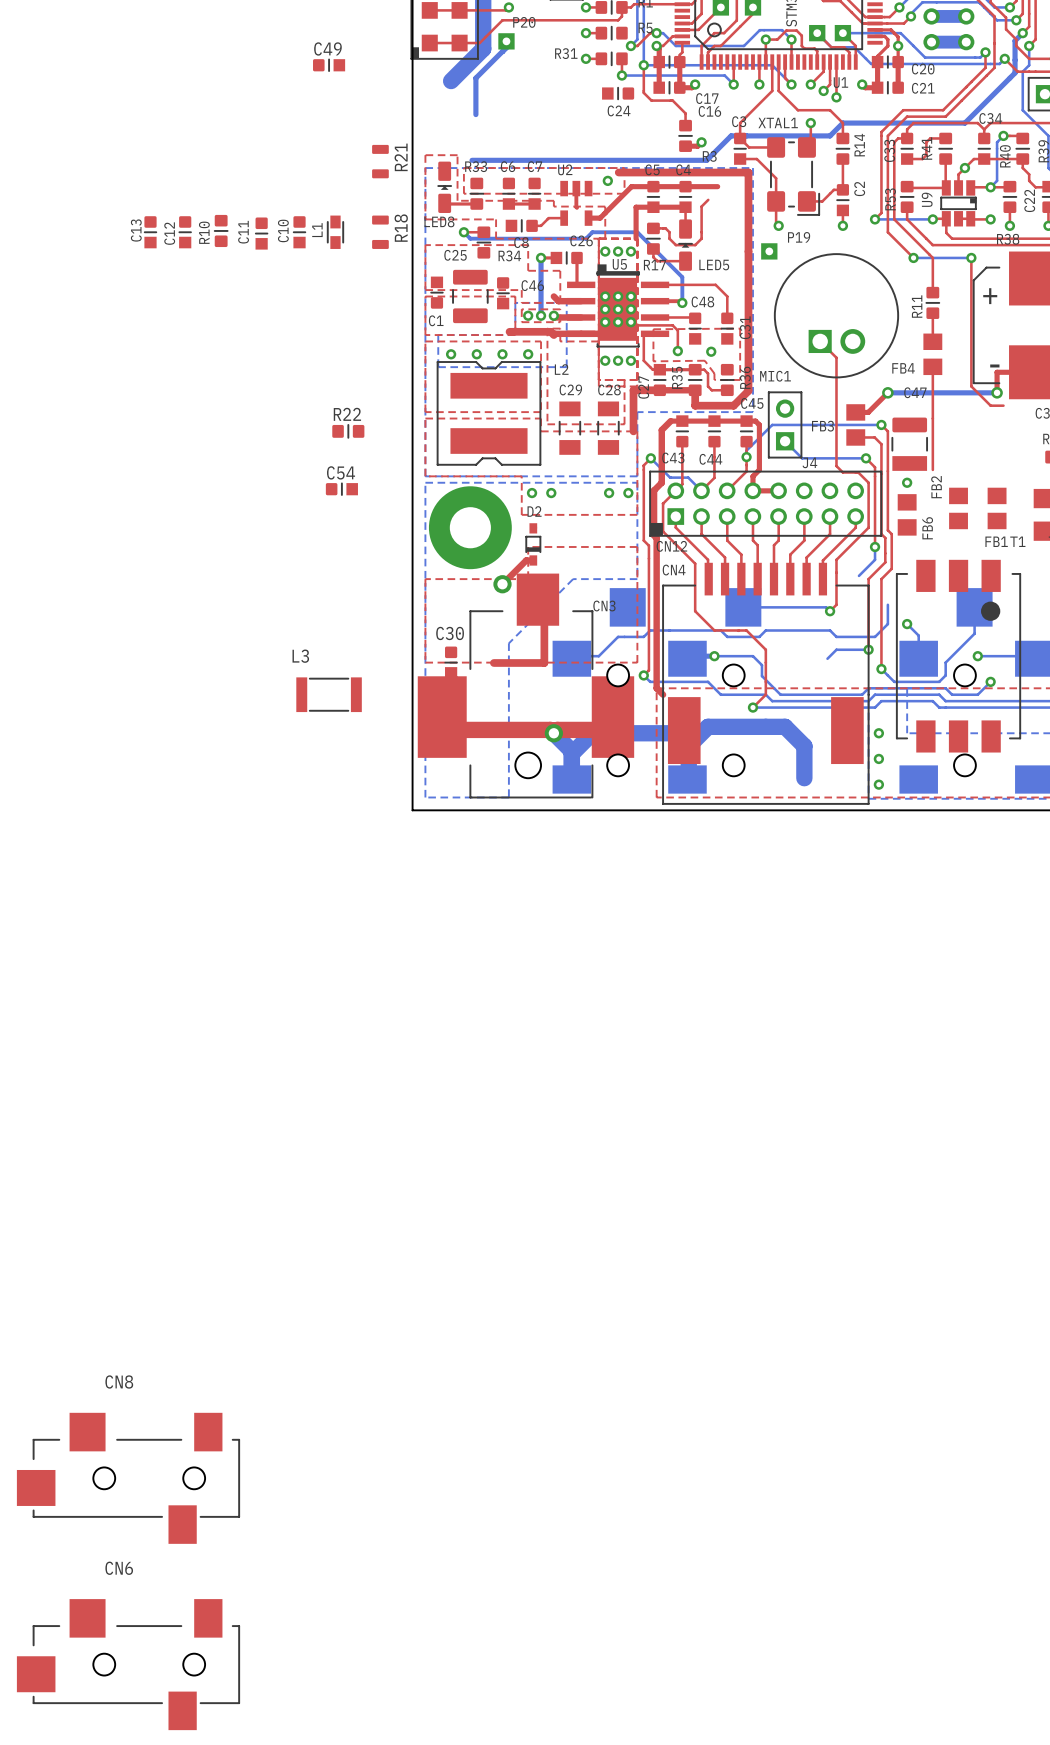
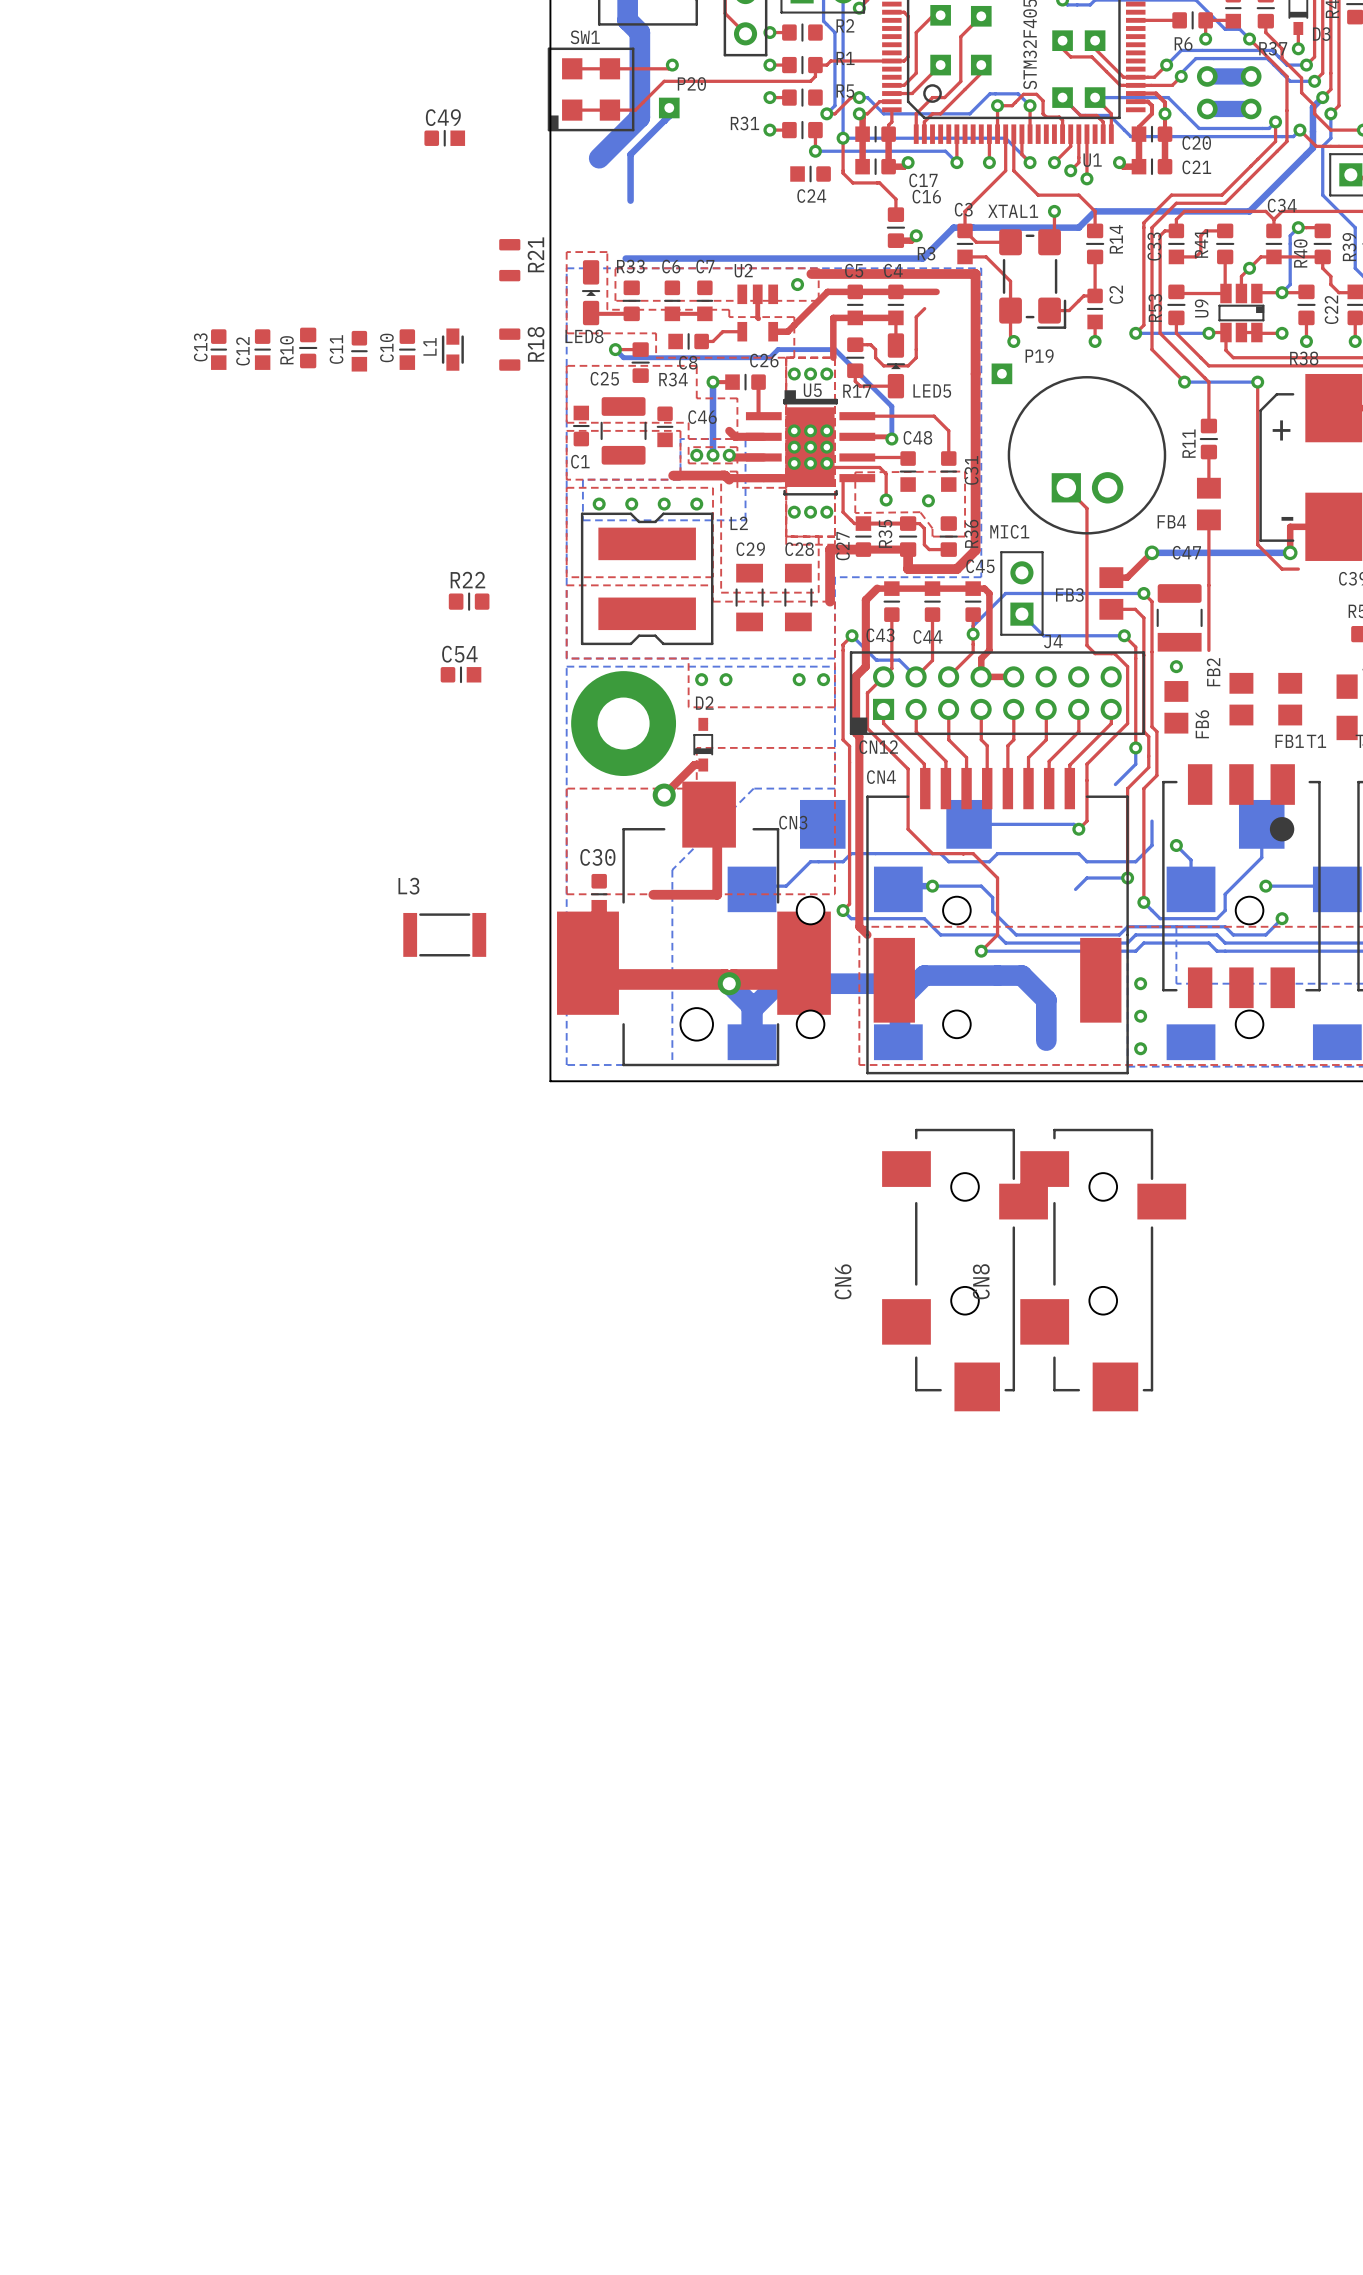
CN8 rotation: 0° (128, 1478) -> 90° counterclockwise (1103, 1270)
CN8 position: (128, 1478) -> (1103, 1270)
CN6 rotation: 0° (128, 1664) -> 90° counterclockwise (965, 1270)
CN6 position: (128, 1664) -> (965, 1270)

